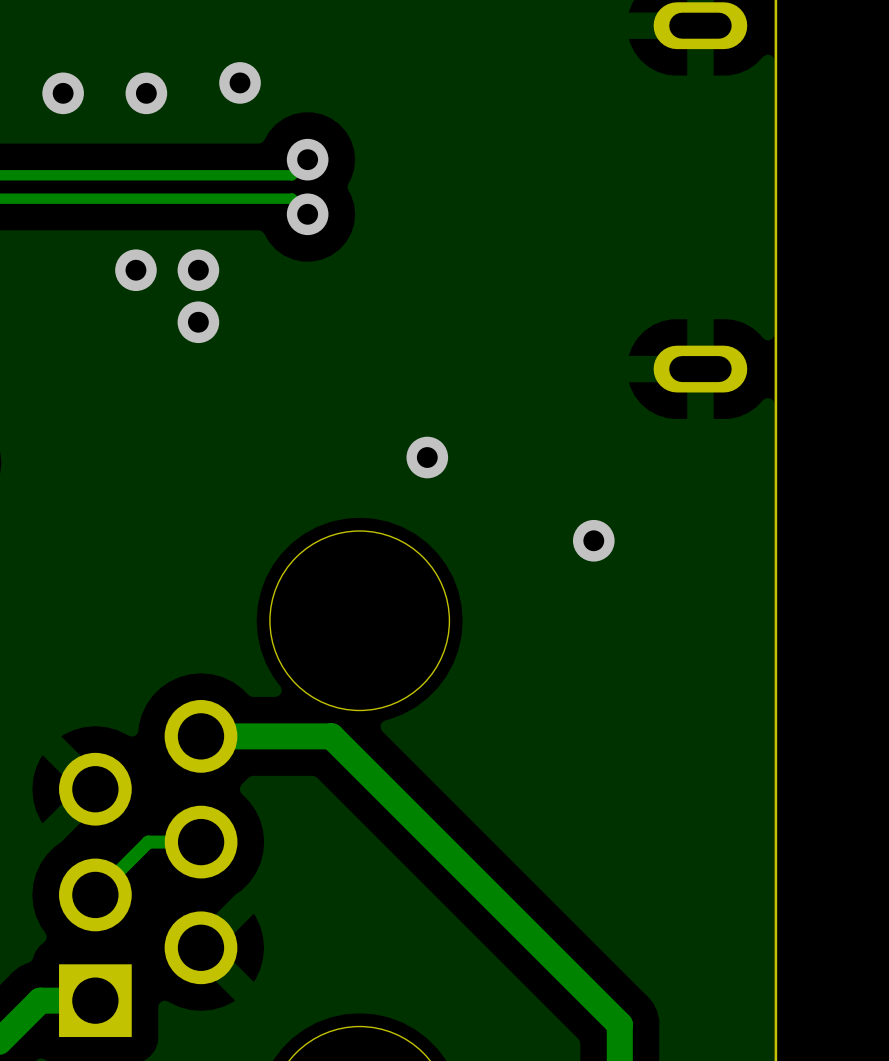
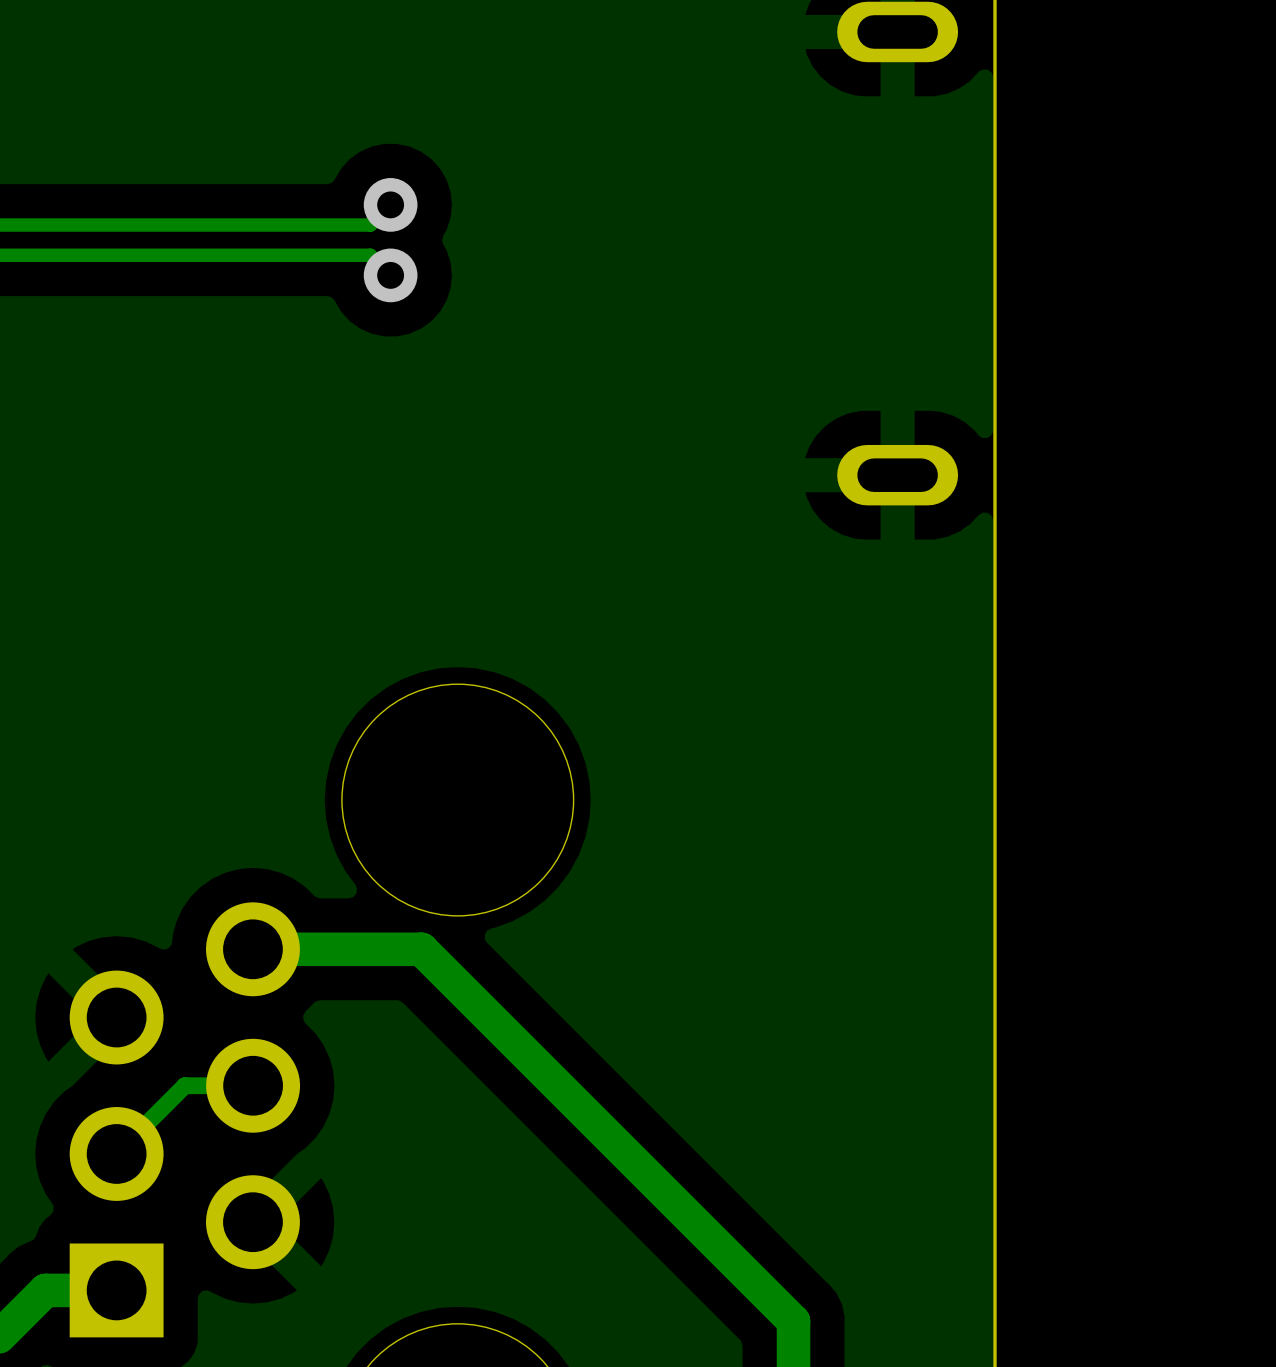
via: (240, 82) -> none
via: (63, 93) -> none
via: (146, 93) -> none
via: (135, 270) -> none
via: (198, 270) -> none
via: (198, 322) -> none
via: (427, 457) -> none
via: (593, 540) -> none

